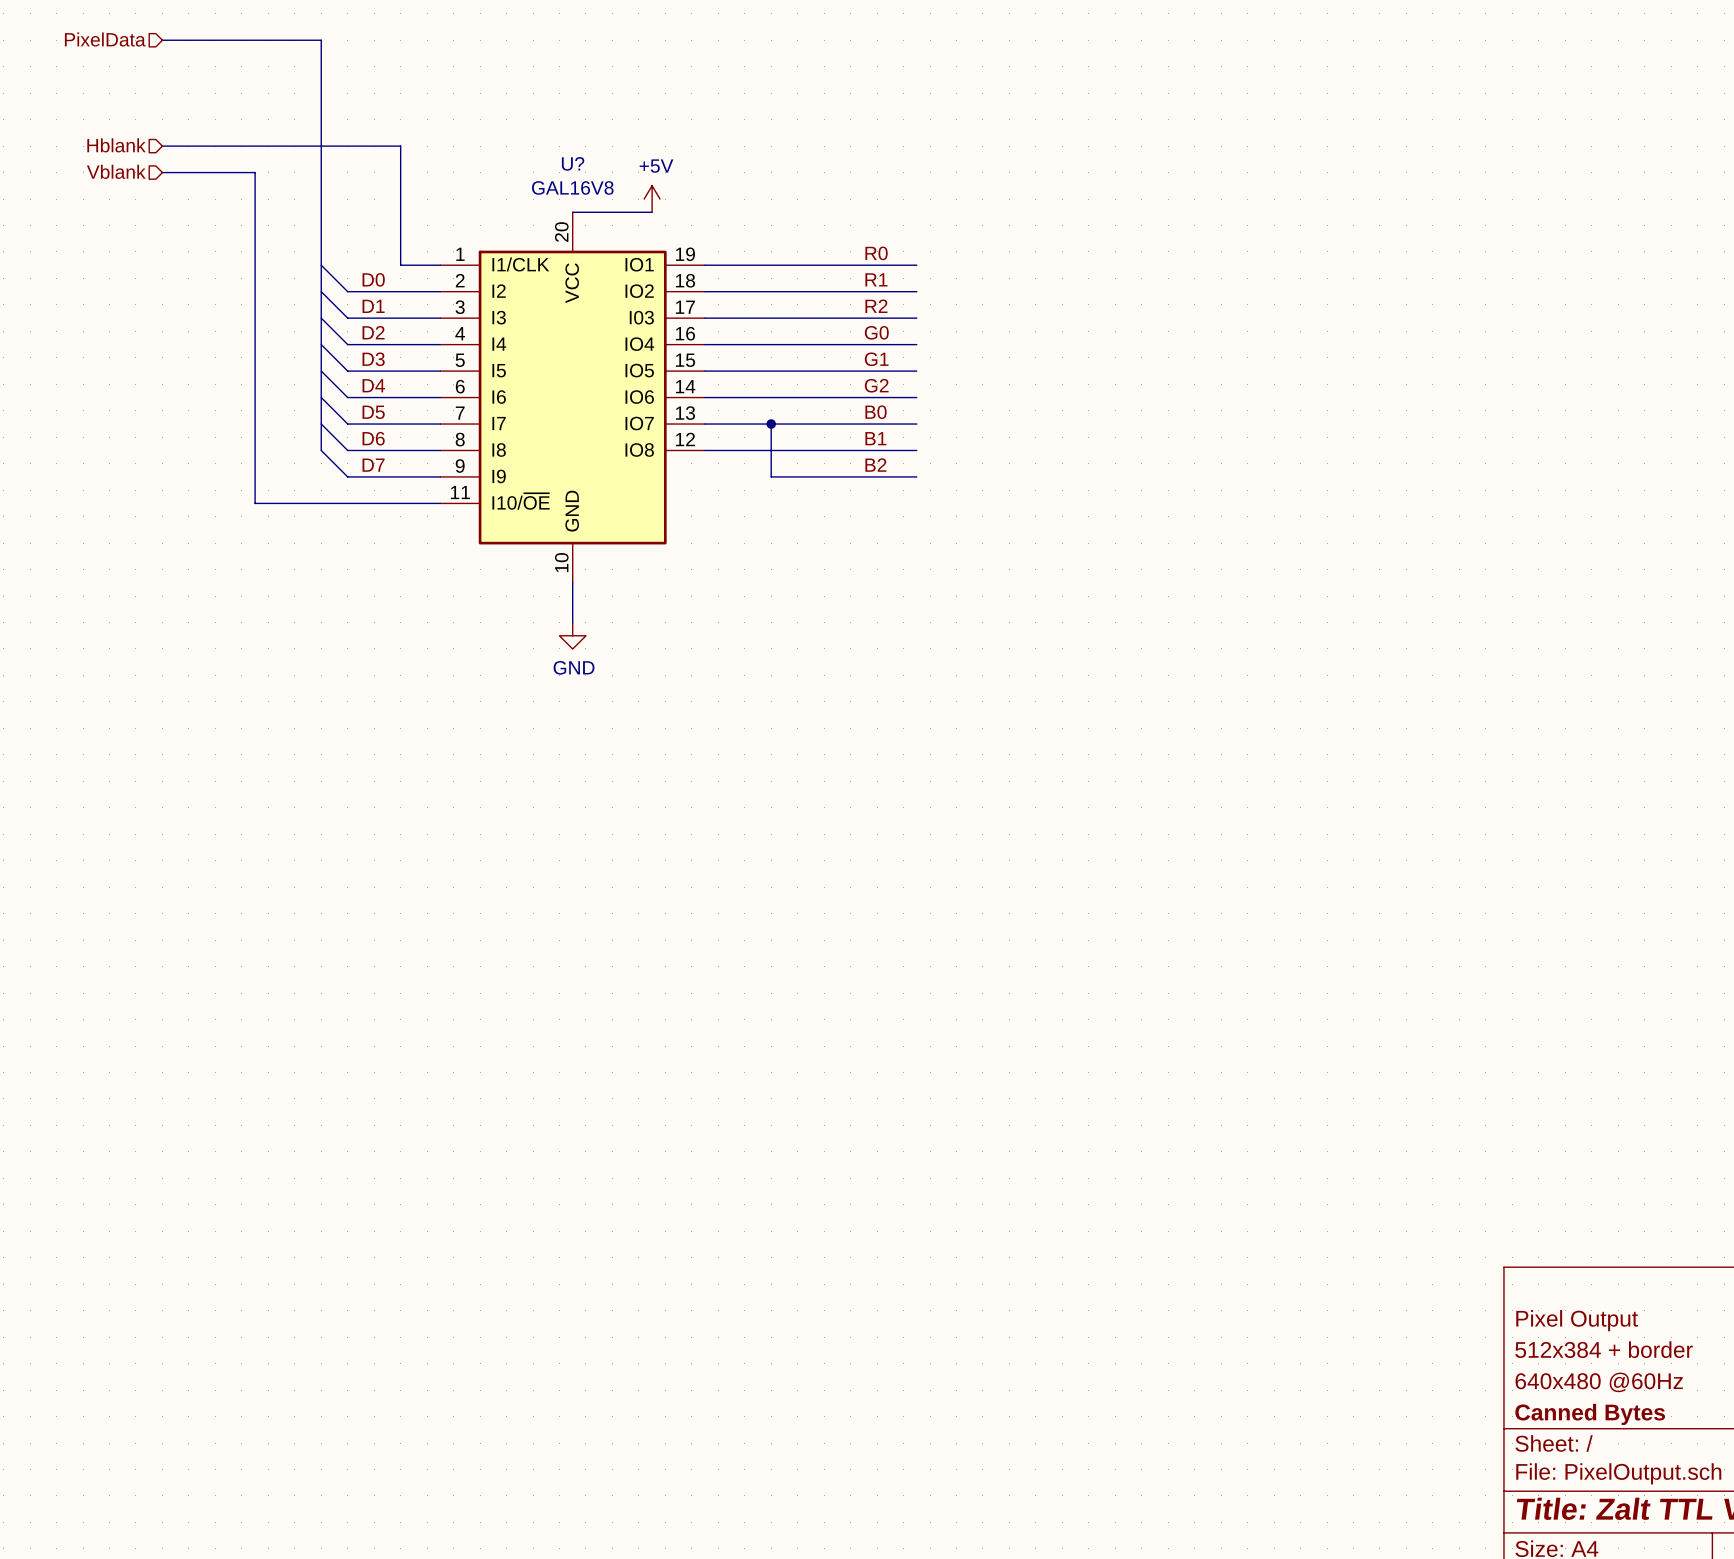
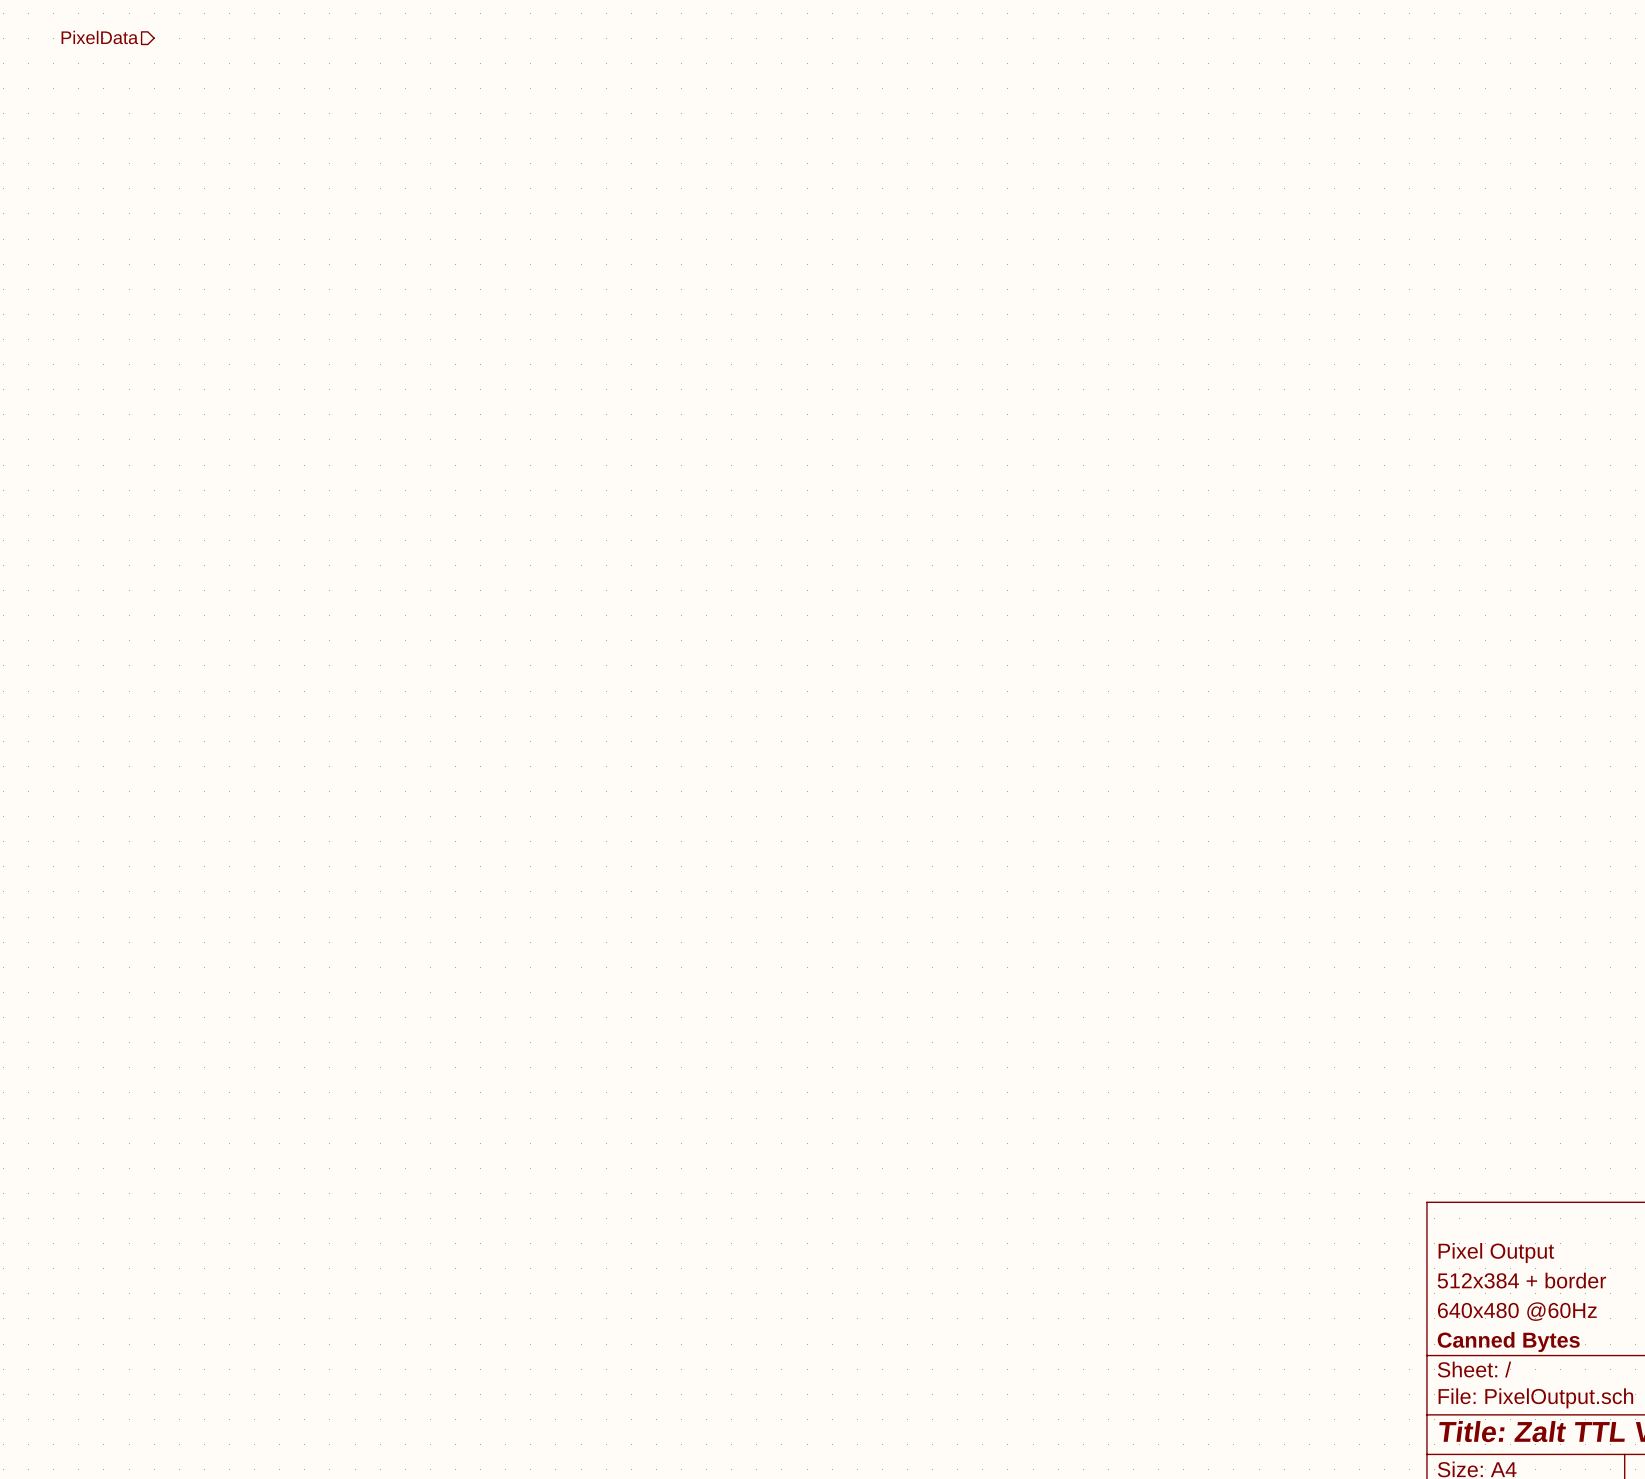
bus: (162, 40) (321, 40) (321, 450) -> none
hierarchical label: Hblank (116, 145) -> none
wire: (162, 146) (400, 146) (400, 265) (440, 265) -> none
hierarchical label: Vblank (116, 171) -> none
wire: (162, 172) (255, 172) (255, 503) (440, 503) -> none
power symbol: +5V (652, 199) -> none
wire: (572, 212) (652, 212) -> none
label: R0 (876, 253) -> none
wire: (321, 265) (347, 291) (440, 291) -> none
wire: (705, 265) (916, 265) -> none
label: D0 (373, 279) -> none
label: R1 (876, 279) -> none
wire: (321, 291) (347, 318) (440, 318) -> none
wire: (705, 291) (916, 291) -> none
label: D1 (373, 306) -> none
label: R2 (876, 306) -> none
wire: (321, 318) (347, 344) (440, 344) -> none
wire: (705, 318) (916, 318) -> none
label: D2 (373, 332) -> none
label: G0 (876, 332) -> none
wire: (321, 344) (347, 371) (440, 371) -> none
wire: (705, 344) (916, 344) -> none
label: D3 (373, 359) -> none
label: G1 (876, 359) -> none
wire: (321, 371) (347, 397) (440, 397) -> none
wire: (705, 371) (916, 371) -> none
label: D4 (373, 385) -> none
label: G2 (876, 385) -> none
wire: (321, 397) (347, 424) (440, 424) -> none
U?: GAL16V8 (572, 397) -> none
wire: (705, 397) (916, 397) -> none
label: D5 (373, 412) -> none
label: B0 (876, 412) -> none
wire: (321, 424) (347, 450) (440, 450) -> none
wire: (705, 424) (916, 424) -> none
wire: (771, 424) (771, 476) (916, 476) -> none
junction: (771, 424) -> none
label: D6 (373, 438) -> none
label: B1 (875, 438) -> none
wire: (321, 450) (347, 476) (440, 476) -> none
wire: (705, 450) (916, 450) -> none
label: D7 (373, 465) -> none
label: B2 (875, 465) -> none
wire: (572, 582) (572, 622) -> none
power symbol: GND (572, 635) -> none

